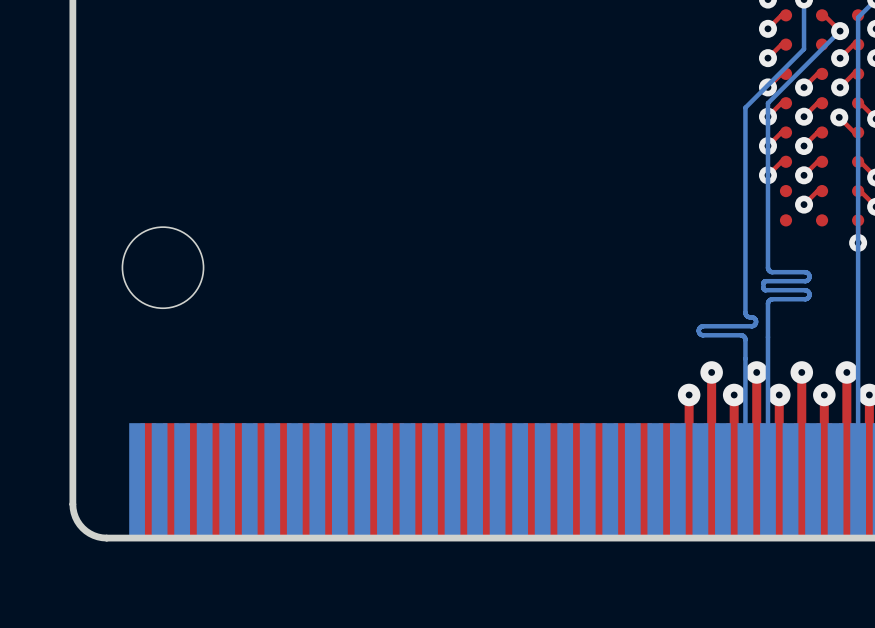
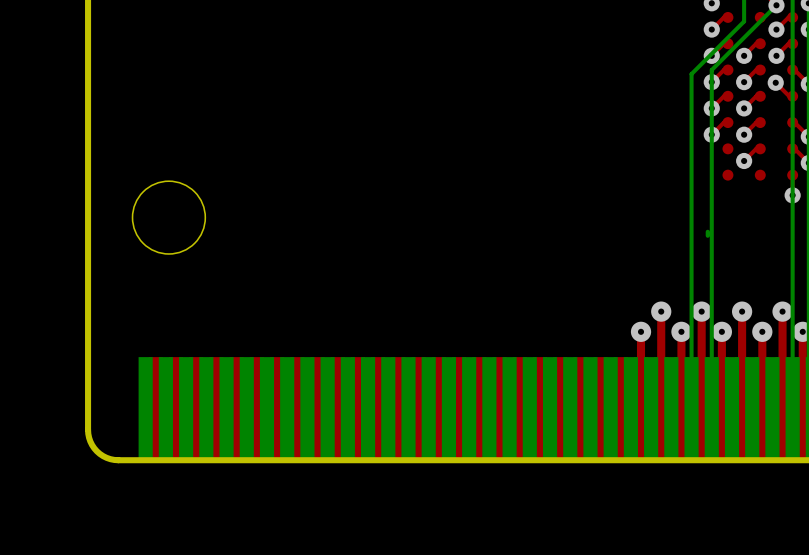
bottom track: (767, 267) (771, 272) (806, 272) (809, 277) (805, 281) (765, 281) -> (711, 217) (711, 249)
bottom track: (765, 290) (805, 290) (809, 293) (806, 299) (771, 299) (767, 303) -> none
bottom track: (745, 312) (747, 316) (755, 318) (754, 325) (703, 326) (698, 330) (703, 335) (741, 335) (745, 339) -> (691, 258) (691, 282)

